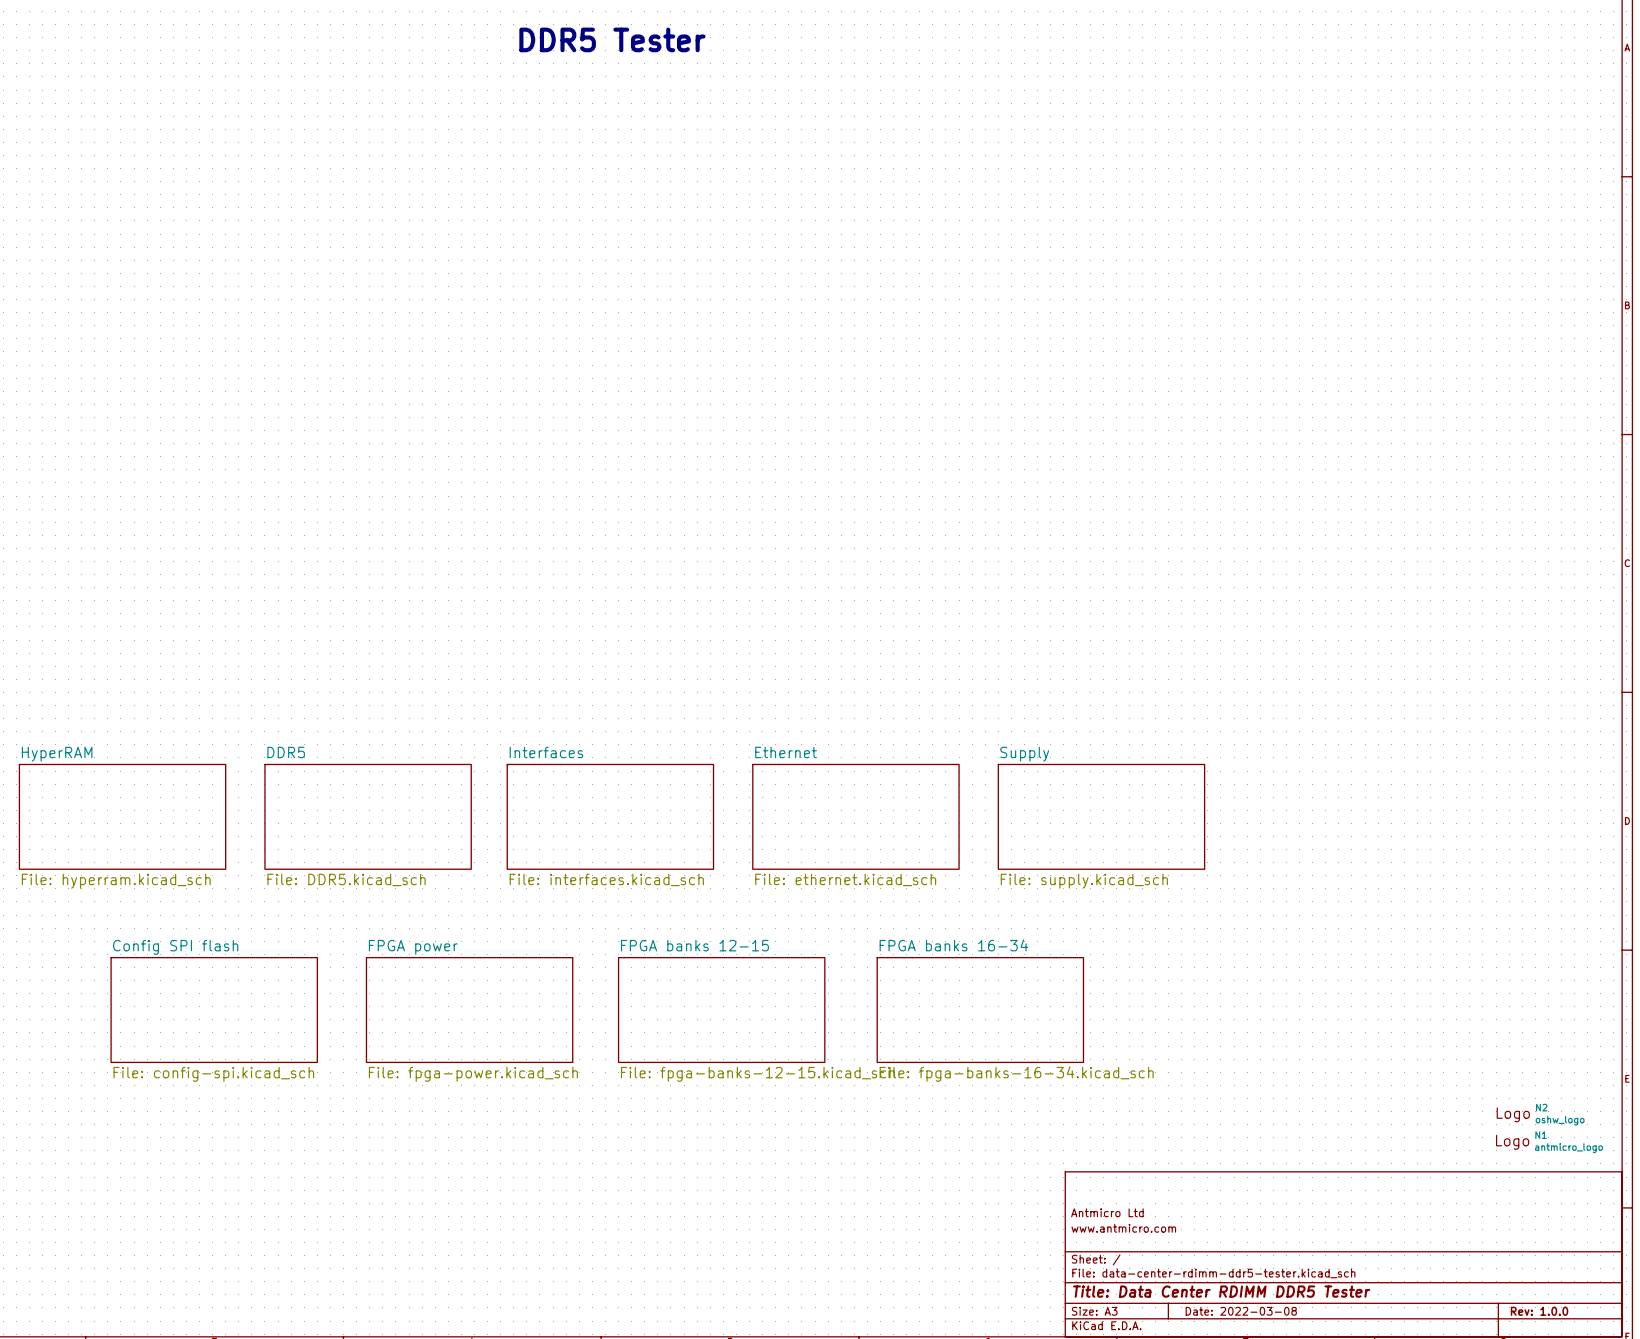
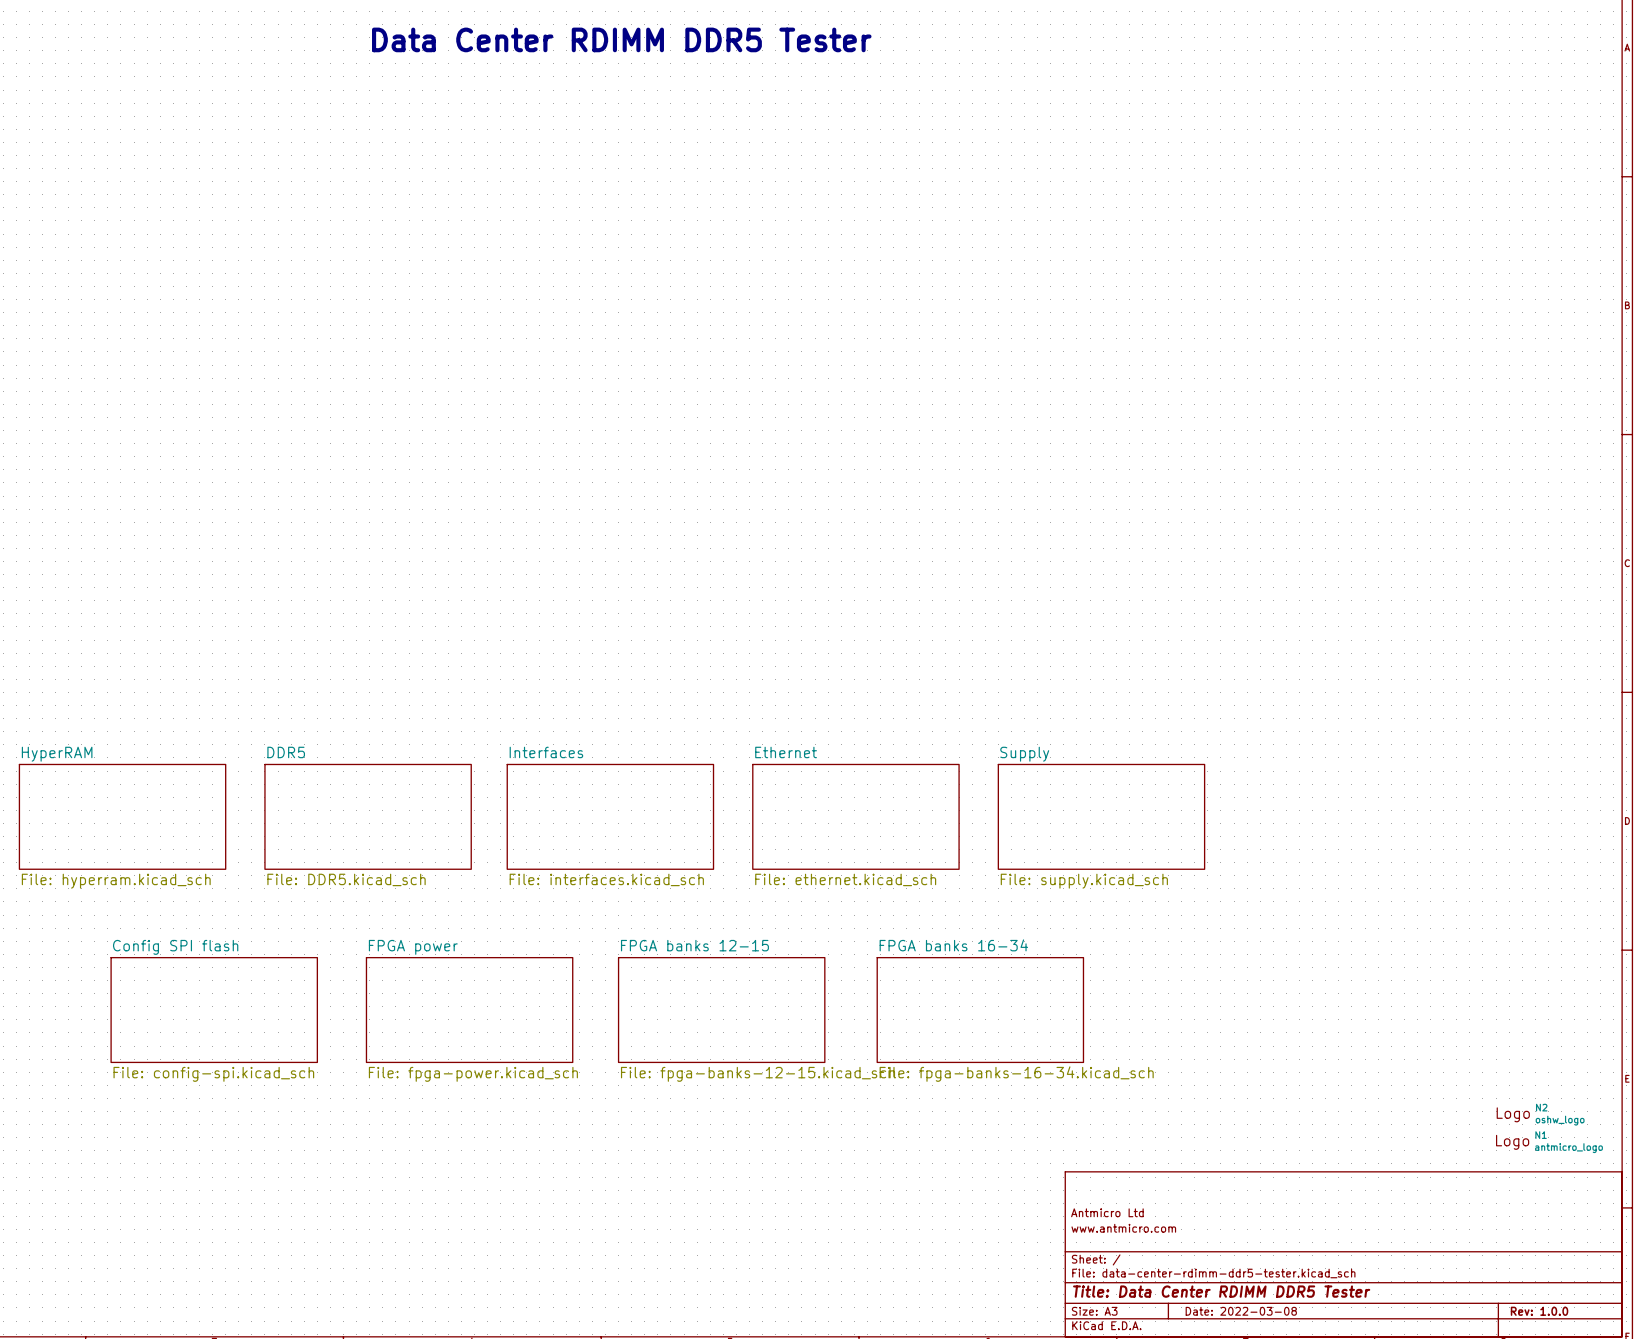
text: DDR5 Tester (612, 39) -> none
text: none -> Data Center RDIMM DDR5 Tester (621, 39)

